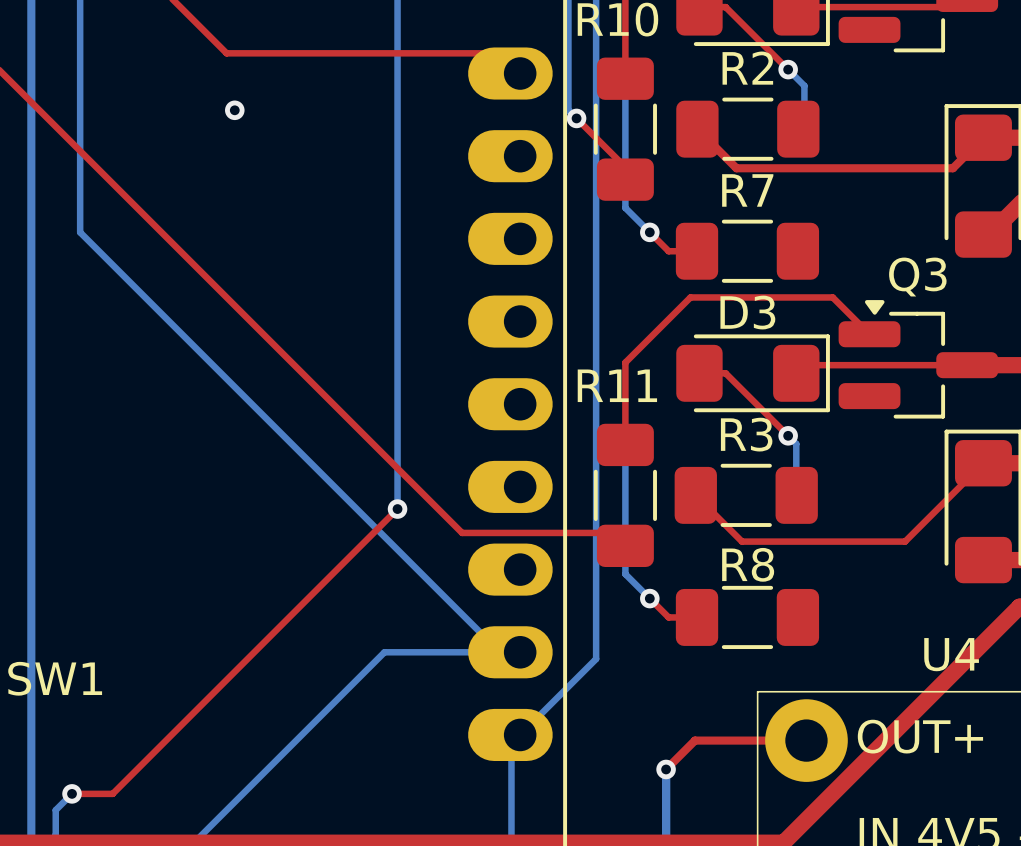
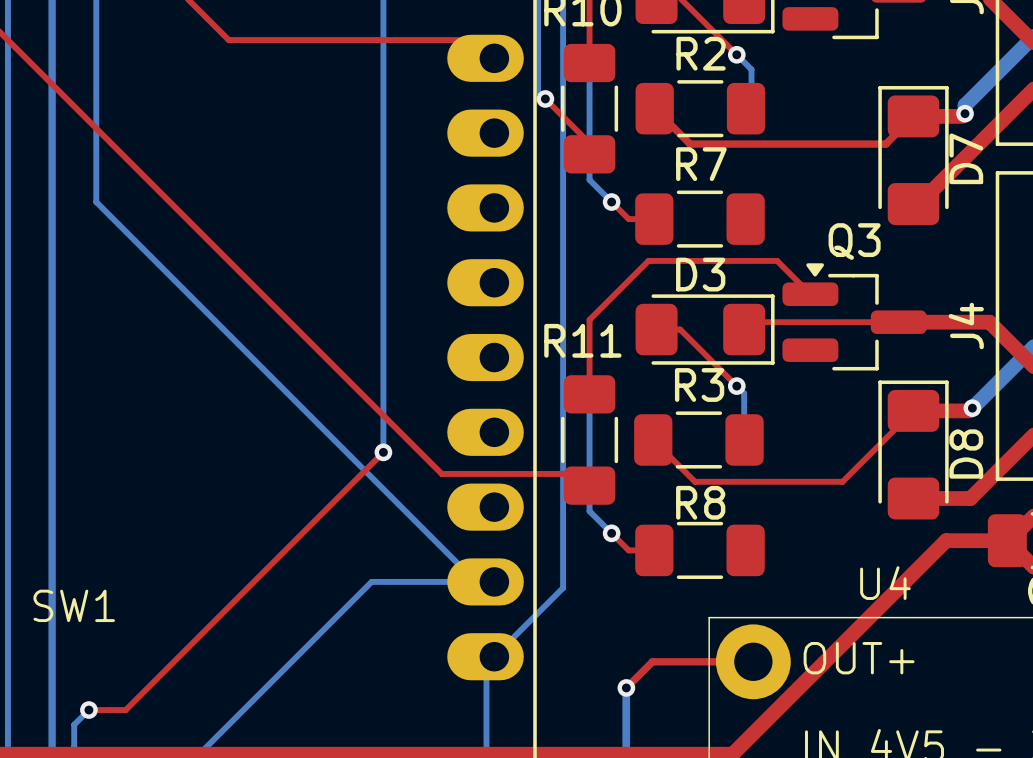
via: (234, 110) -> none

